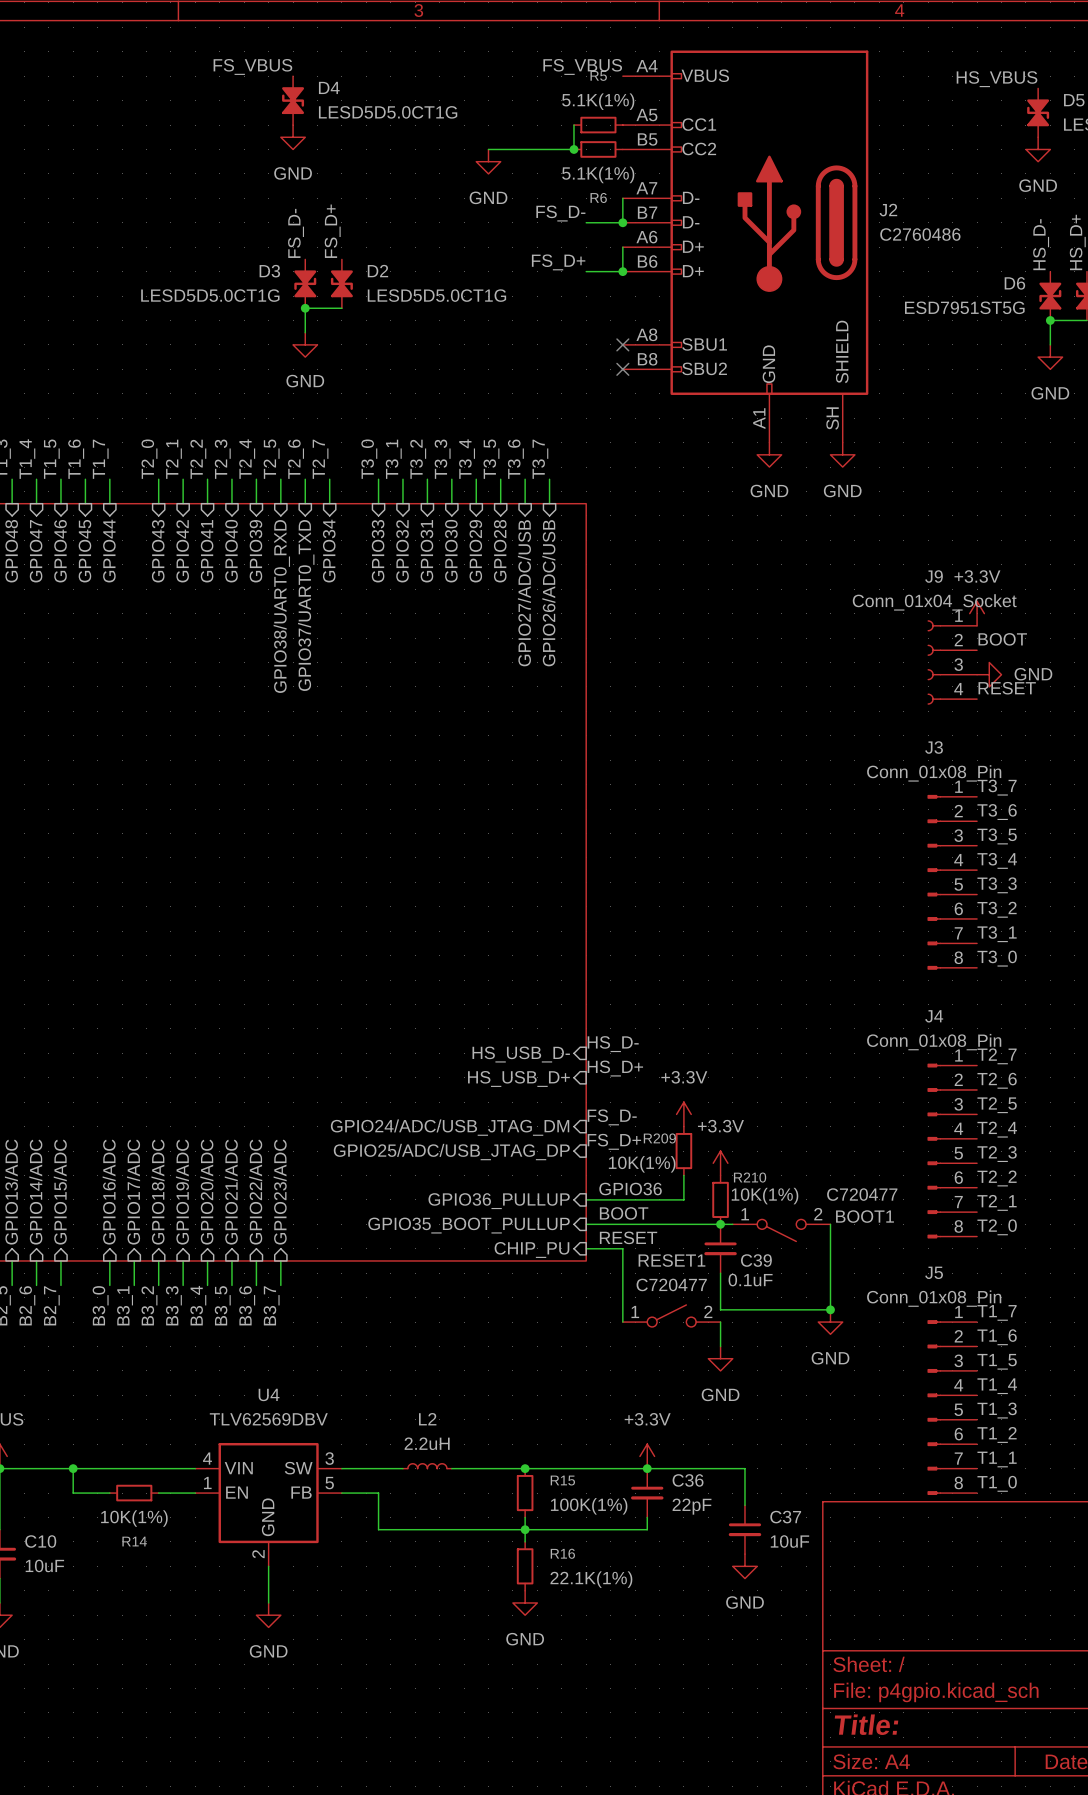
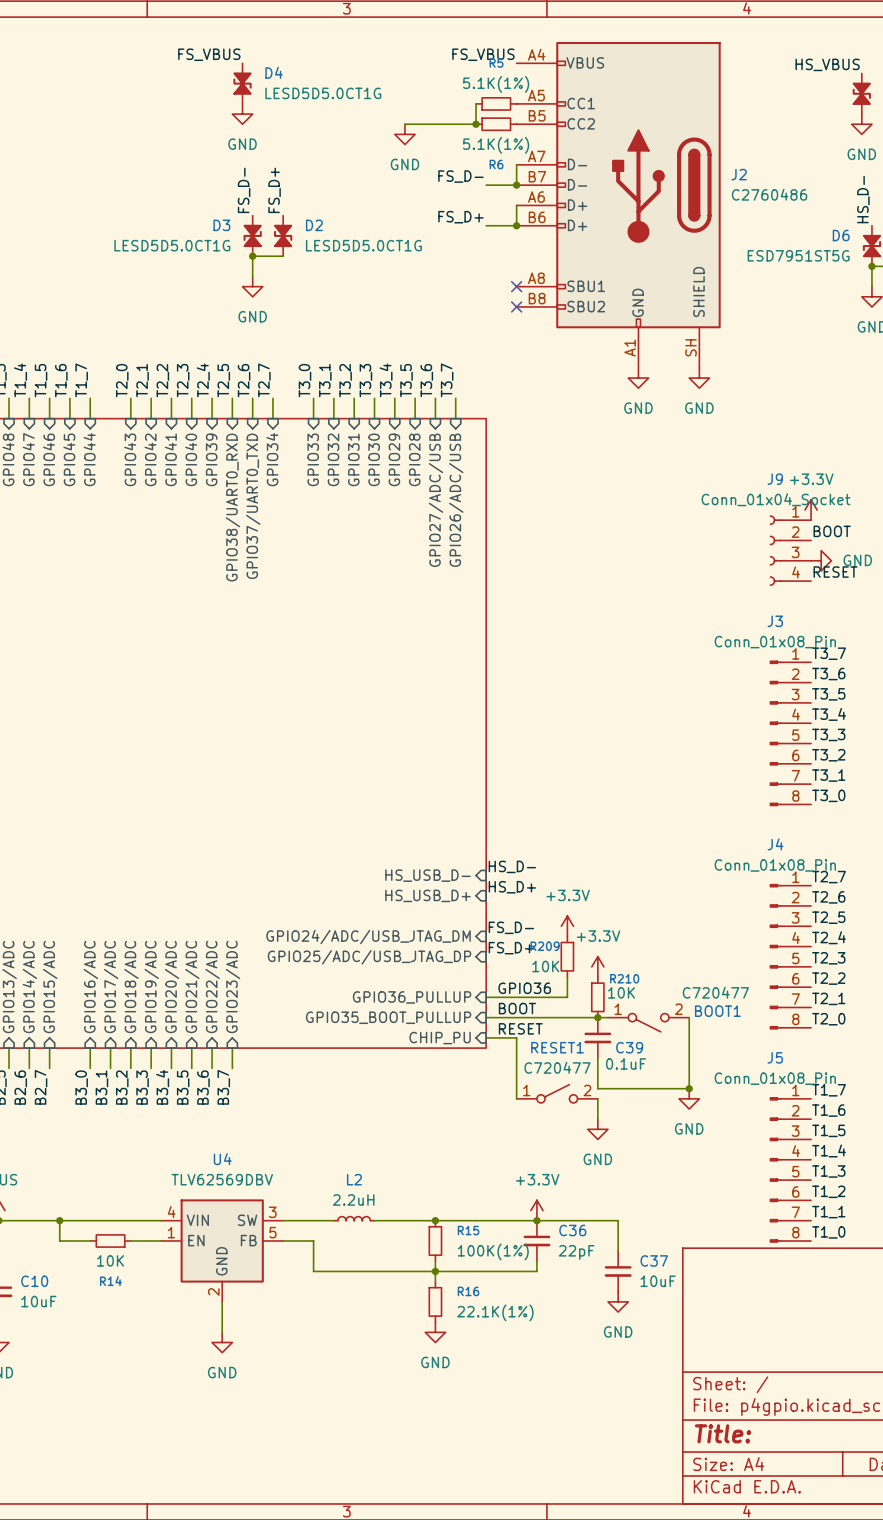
R209 value: 10K(1%) (642, 1164) -> 10K (545, 966)
R210 value: 10K(1%) (764, 1196) -> 10K (621, 992)
R14 value: 10K(1%) (134, 1518) -> 10K (110, 1260)

